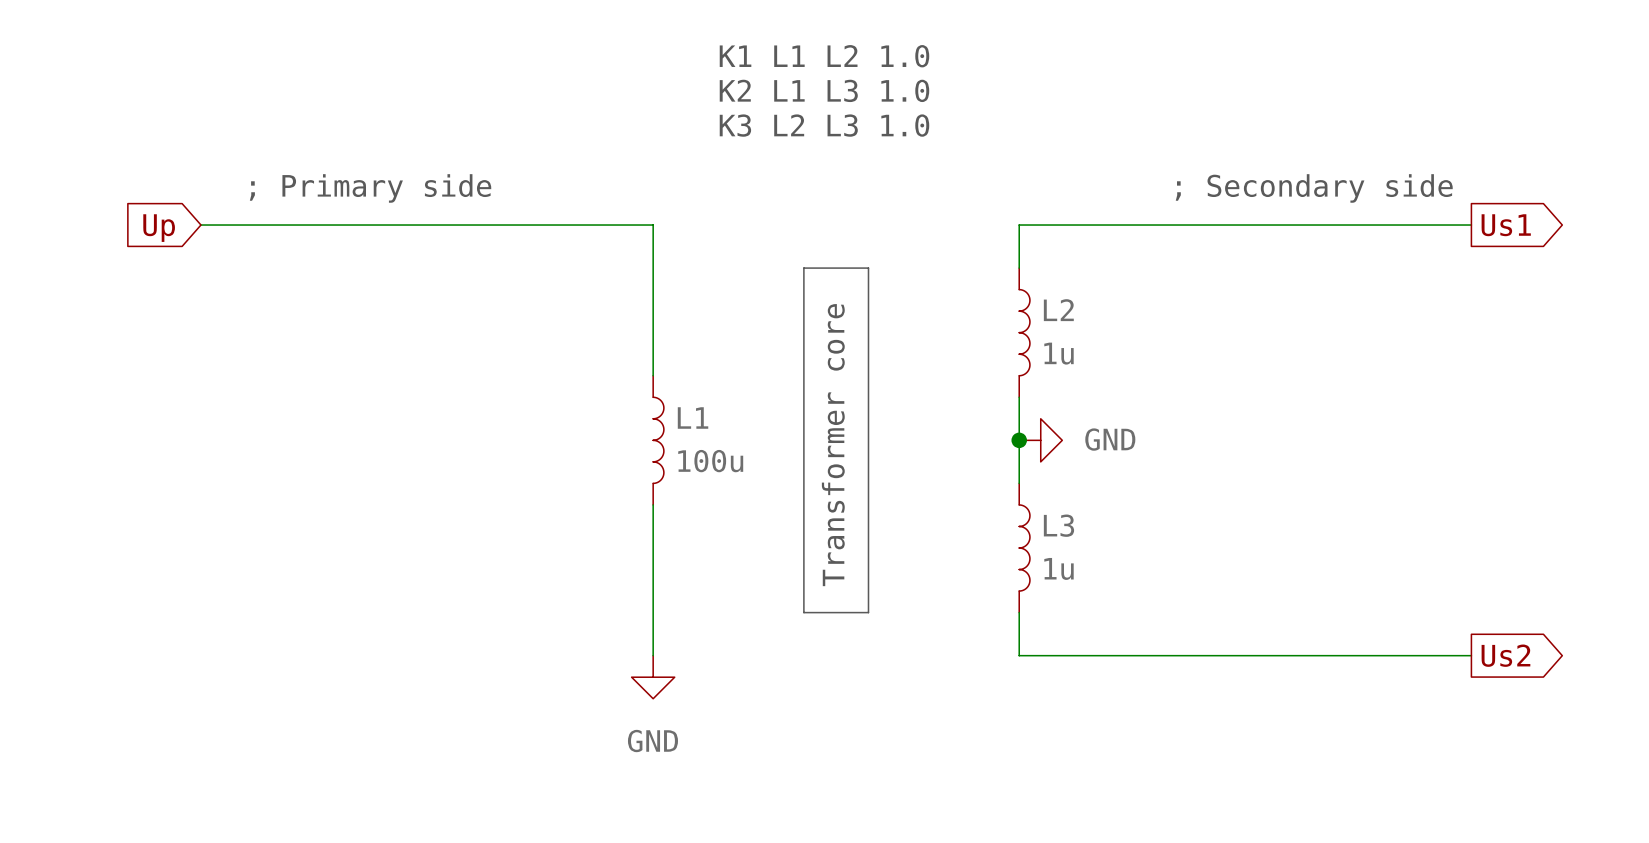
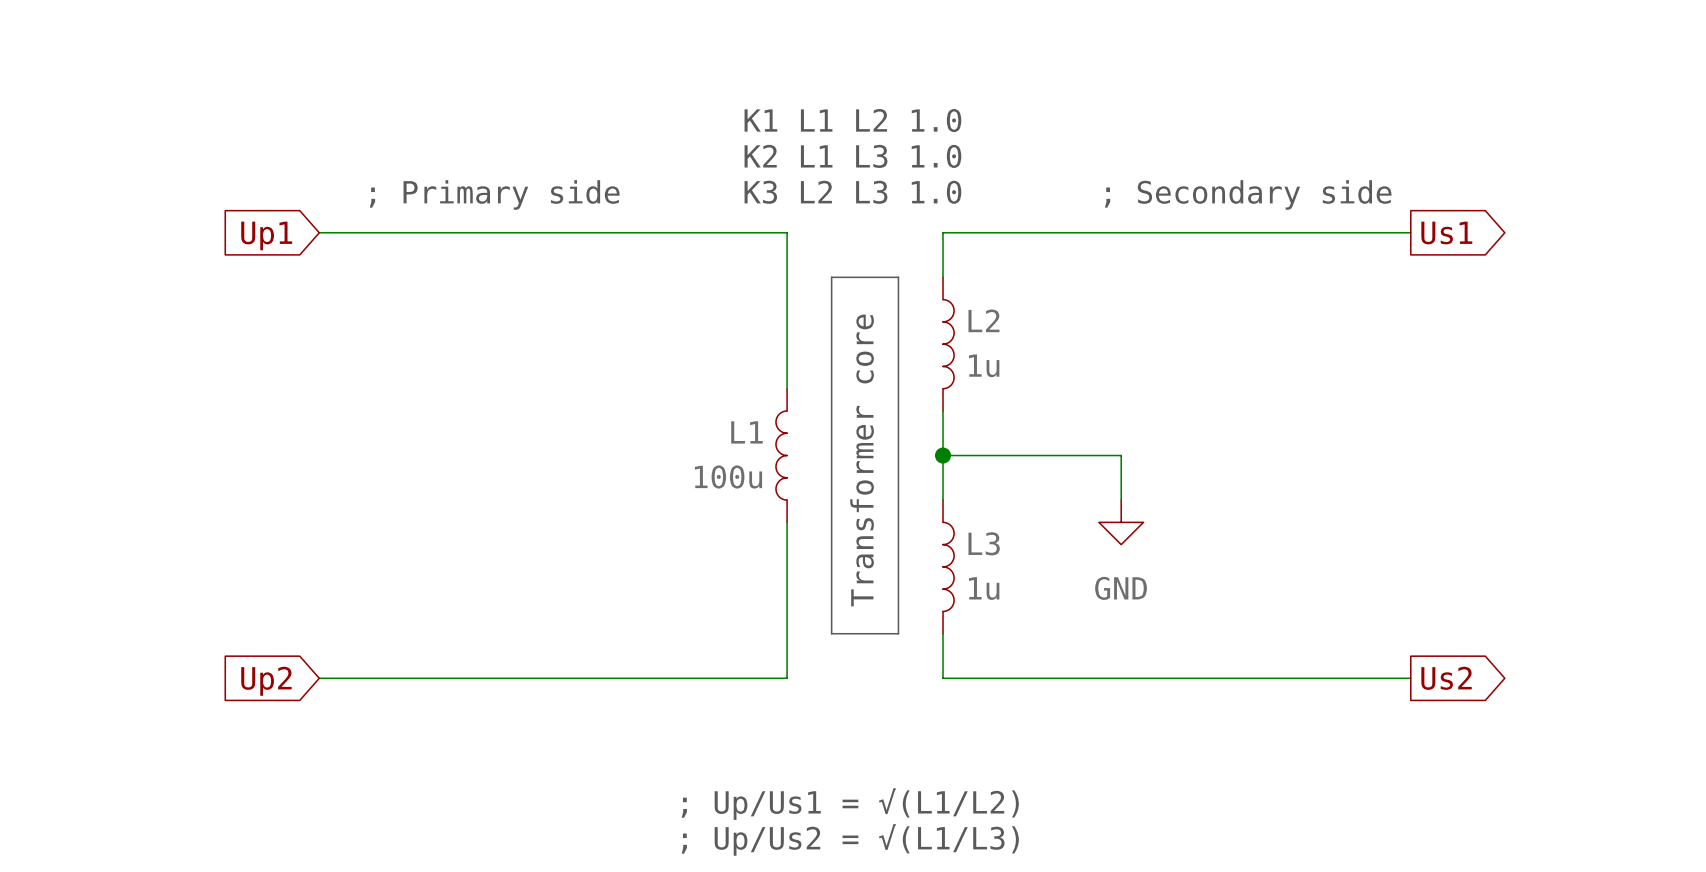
text position: K1 L1 L2 1.0 (824, 56) -> K1 L1 L2 1.0 (852, 120)
text position: K2 L1 L3 1.0 (824, 90) -> K2 L1 L3 1.0 (852, 156)
text position: K3 L2 L3 1.0 (824, 125) -> K3 L2 L3 1.0 (852, 192)
text position: ; Primary side (370, 188) -> ; Primary side (494, 194)
text position: ; Secondary side (1314, 188) -> ; Secondary side (1248, 194)
wire: (200, 225) (308, 225) -> none
wire: (653, 225) (653, 375) -> (675, 232) (787, 232) (787, 388)
wire: (1019, 225) (1019, 268) -> (1054, 232) (943, 232) (943, 277)
wire: (1363, 225) (1471, 225) -> none
global label position: Us1 (1506, 225) -> Us1 (1446, 232)
global label: Up (159, 228) -> Up1 (266, 235)
L2 position: (1024, 332) -> (948, 344)
wire: (1019, 397) (1019, 483) -> (943, 410) (943, 500)
L1 name position: L1 (693, 418) -> L1 (746, 432)
L1 rotation: 0° (658, 440) -> 180° (781, 455)
L1 position: (658, 440) -> (781, 455)
wire: none -> (943, 455) (1121, 455) (1121, 500)
junction: none -> (943, 455)
junction: (1019, 440) -> none
power symbol rotation: 0° (1040, 440) -> 90° clockwise (1121, 522)
power symbol position: GND (1040, 440) -> GND (1121, 522)
L1 value position: 100u (710, 461) -> 100u (728, 476)
wire: (653, 504) (653, 655) -> none
wire: none -> (787, 522) (787, 678) (319, 678)
L3 position: (1024, 548) -> (948, 566)
wire: (1019, 612) (1019, 655) -> (943, 633) (943, 678) (1054, 678)
wire: (1363, 655) (1471, 655) -> none
global label position: Us2 (1505, 655) -> Us2 (1446, 678)
global label: none -> Up2 (266, 681)
power symbol: GND (653, 677) -> none
text: none -> ; Up/Us1 = √(L1/L2) (850, 804)
text: none -> ; Up/Us2 = √(L1/L3) (850, 839)

